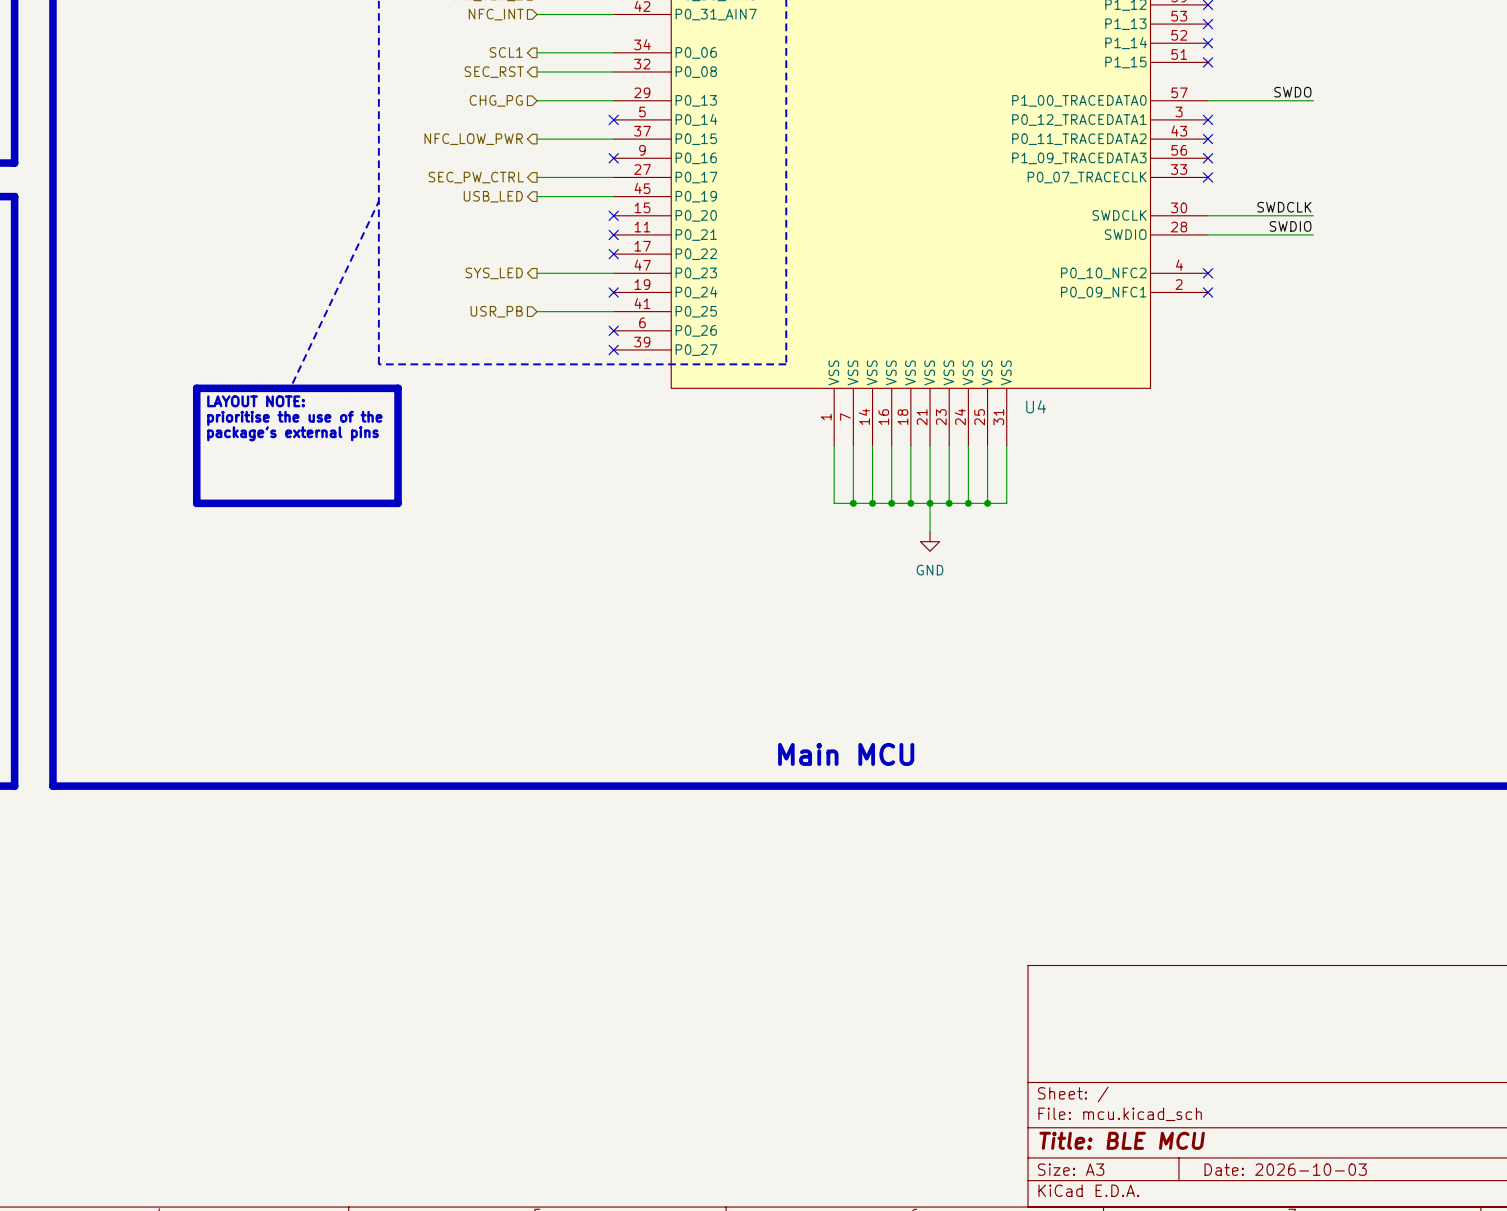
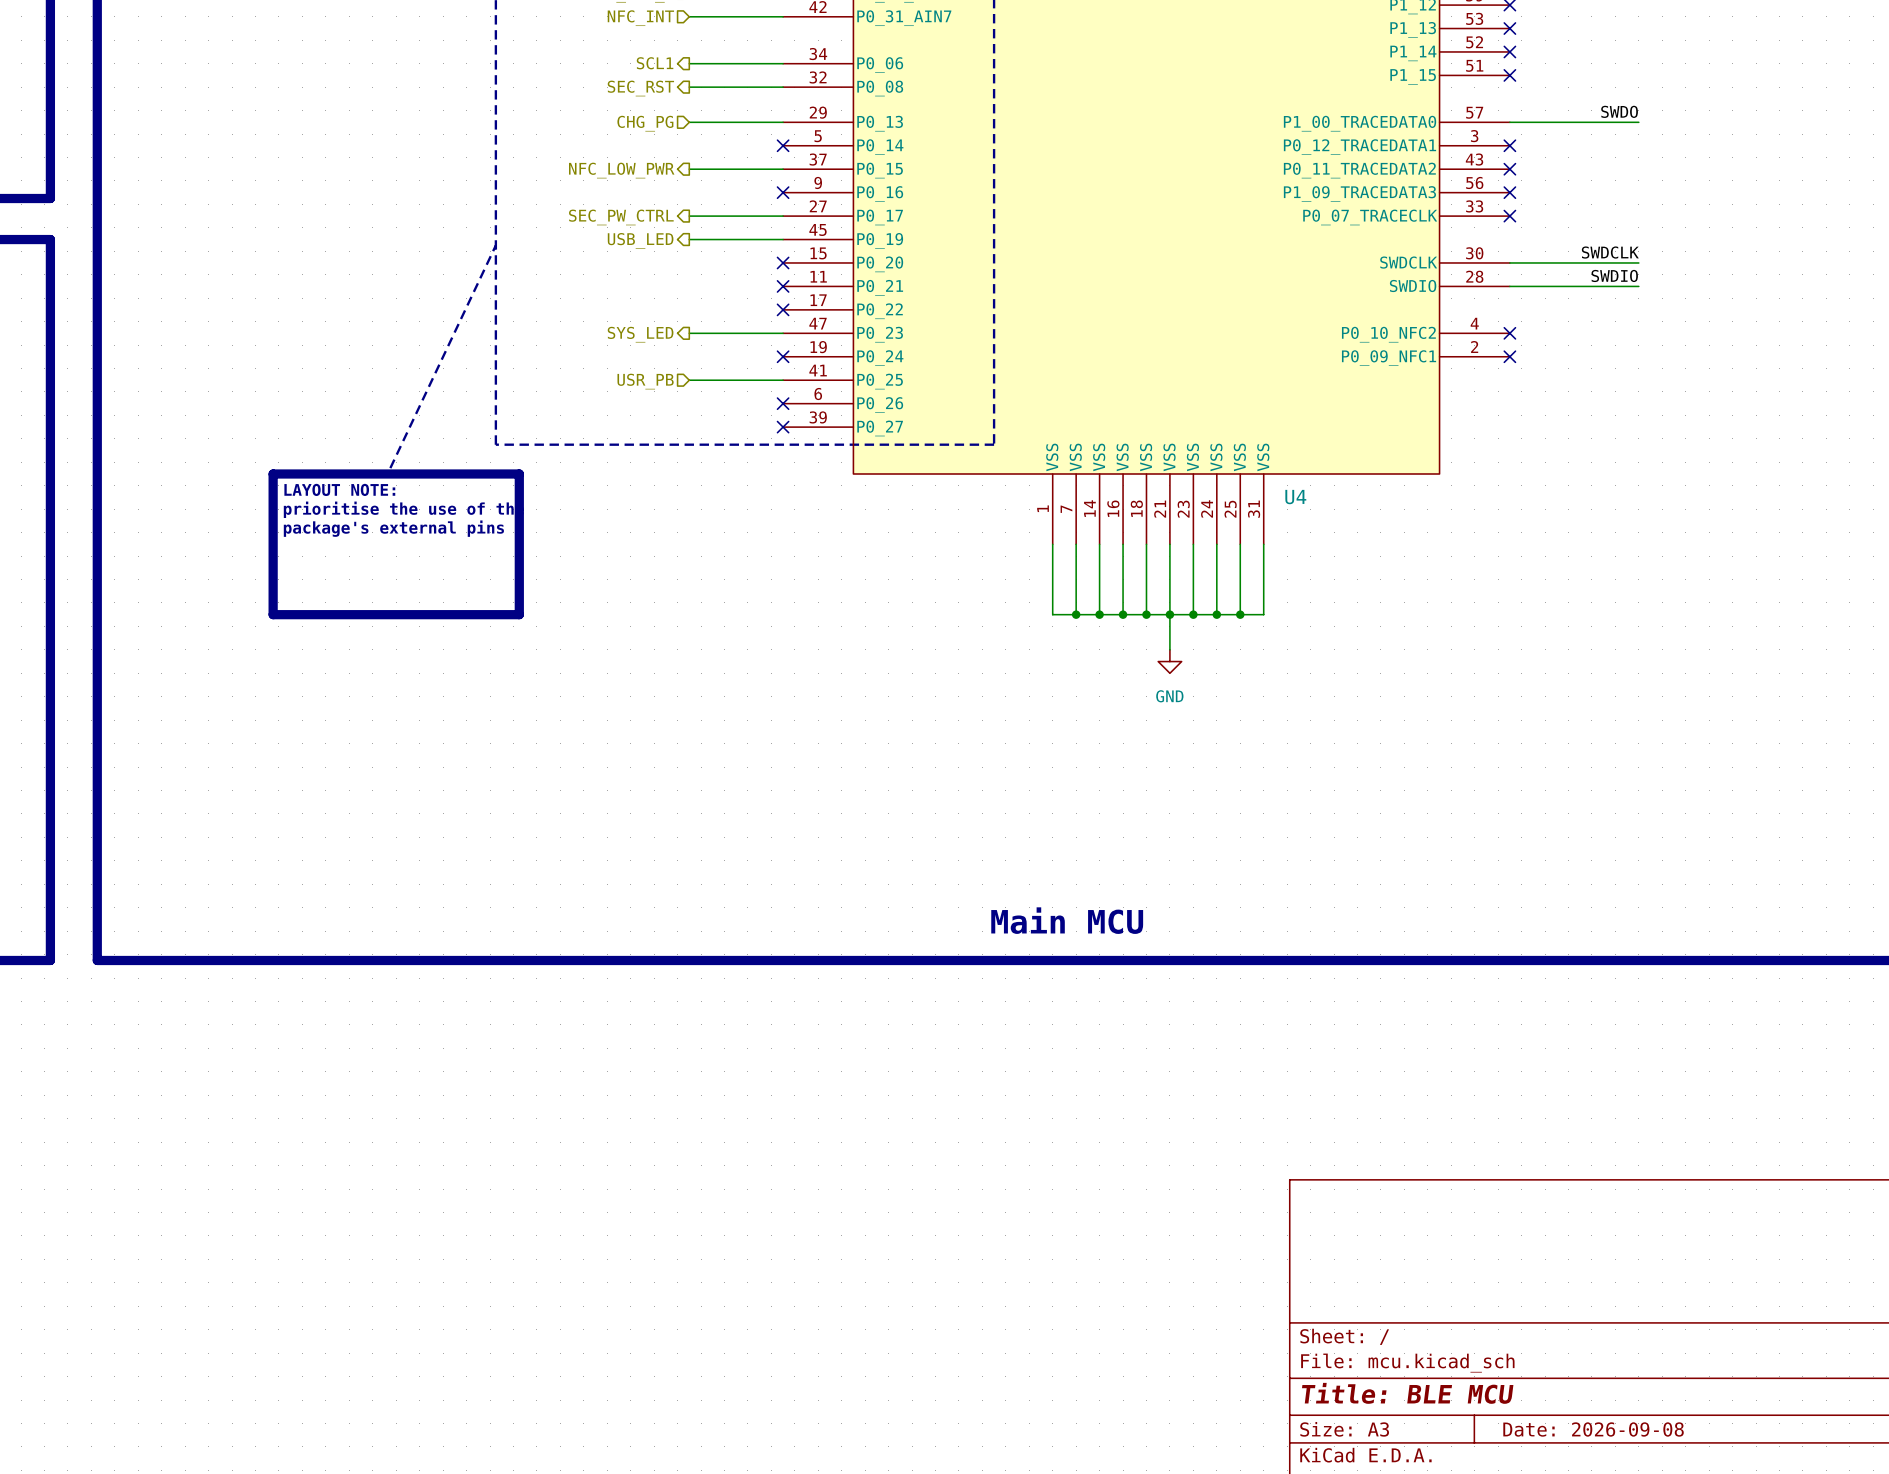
title block: Date: 2026-10-03 (1285, 1169) -> Date: 2026-09-08 (1593, 1429)

